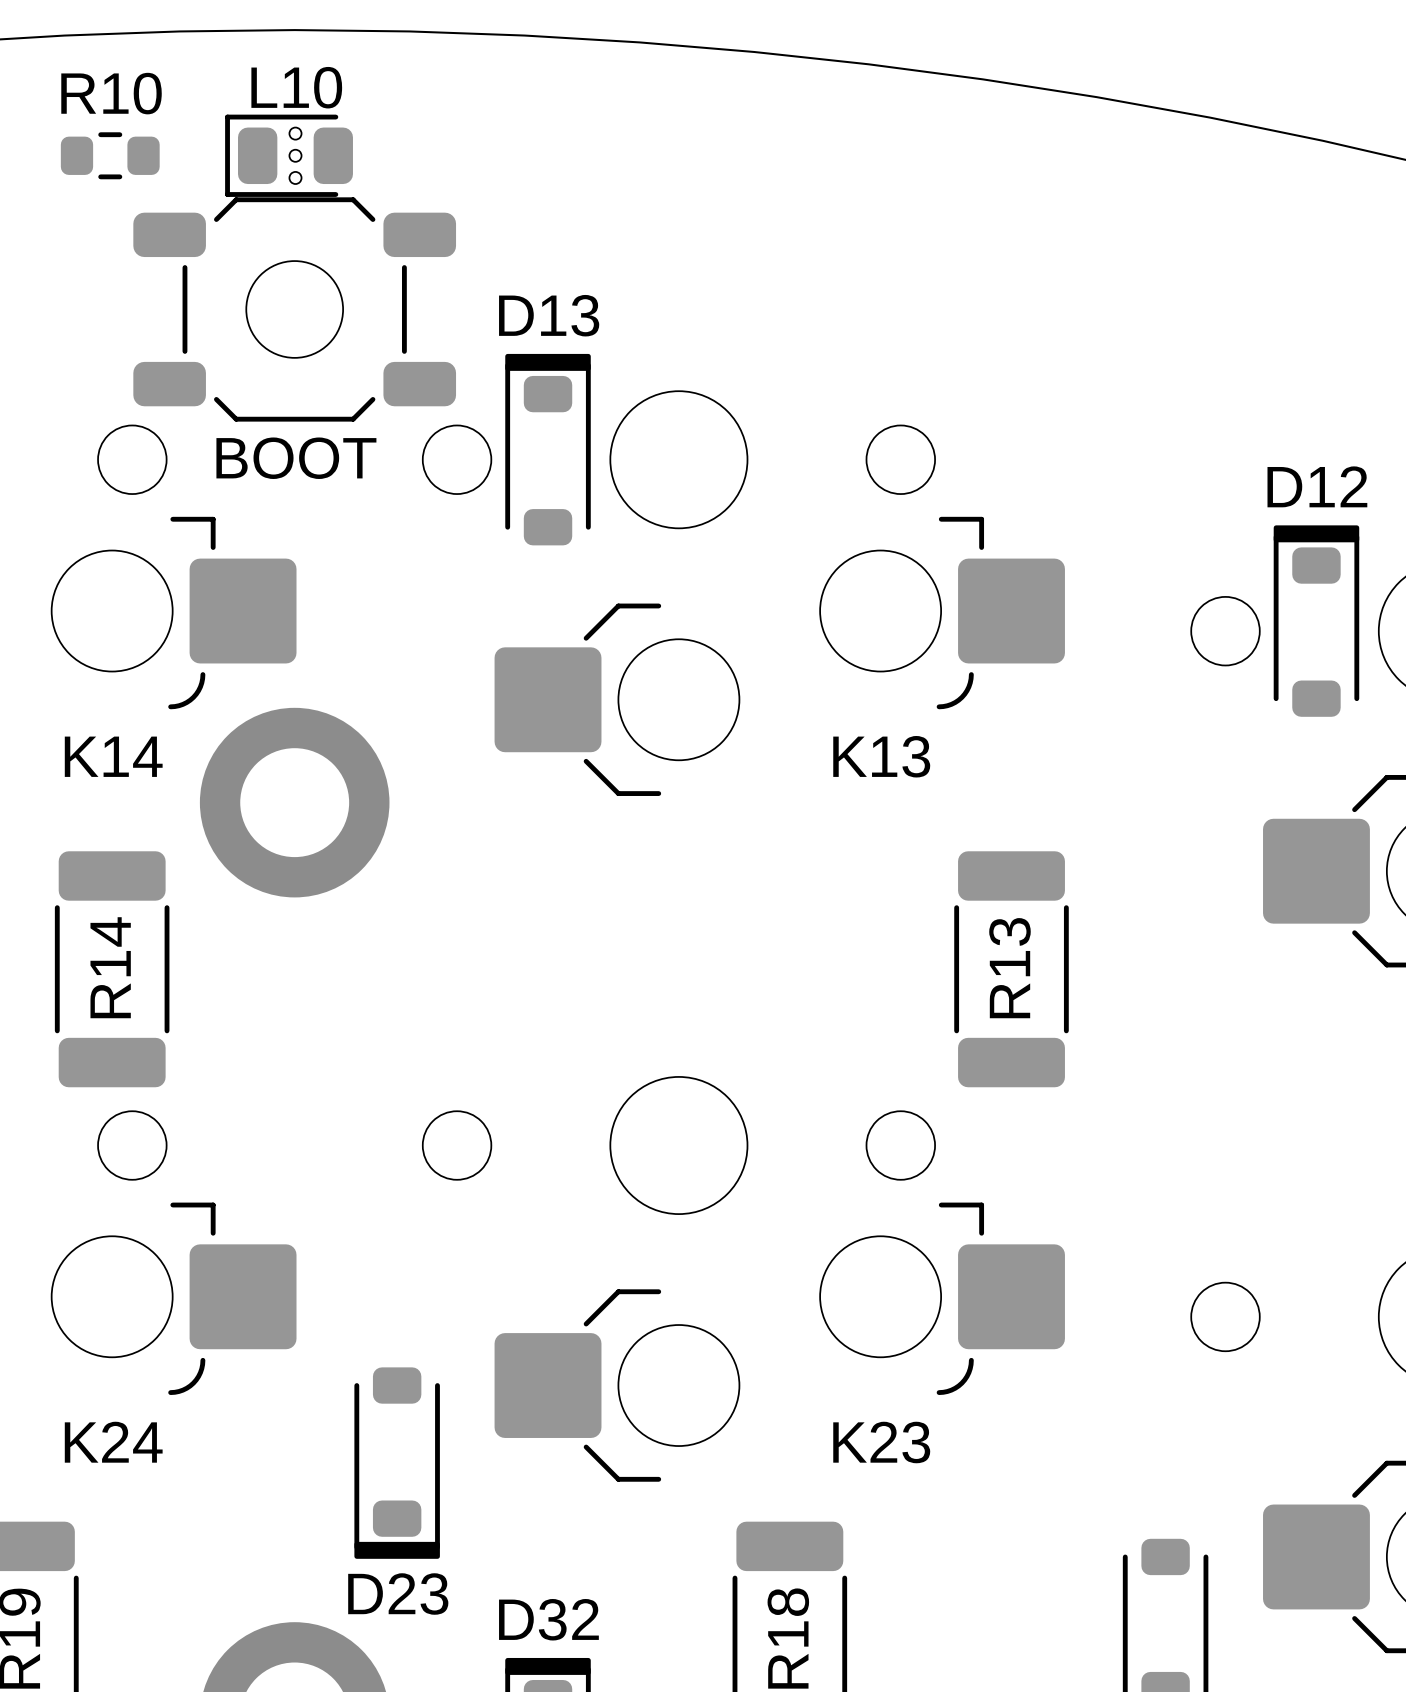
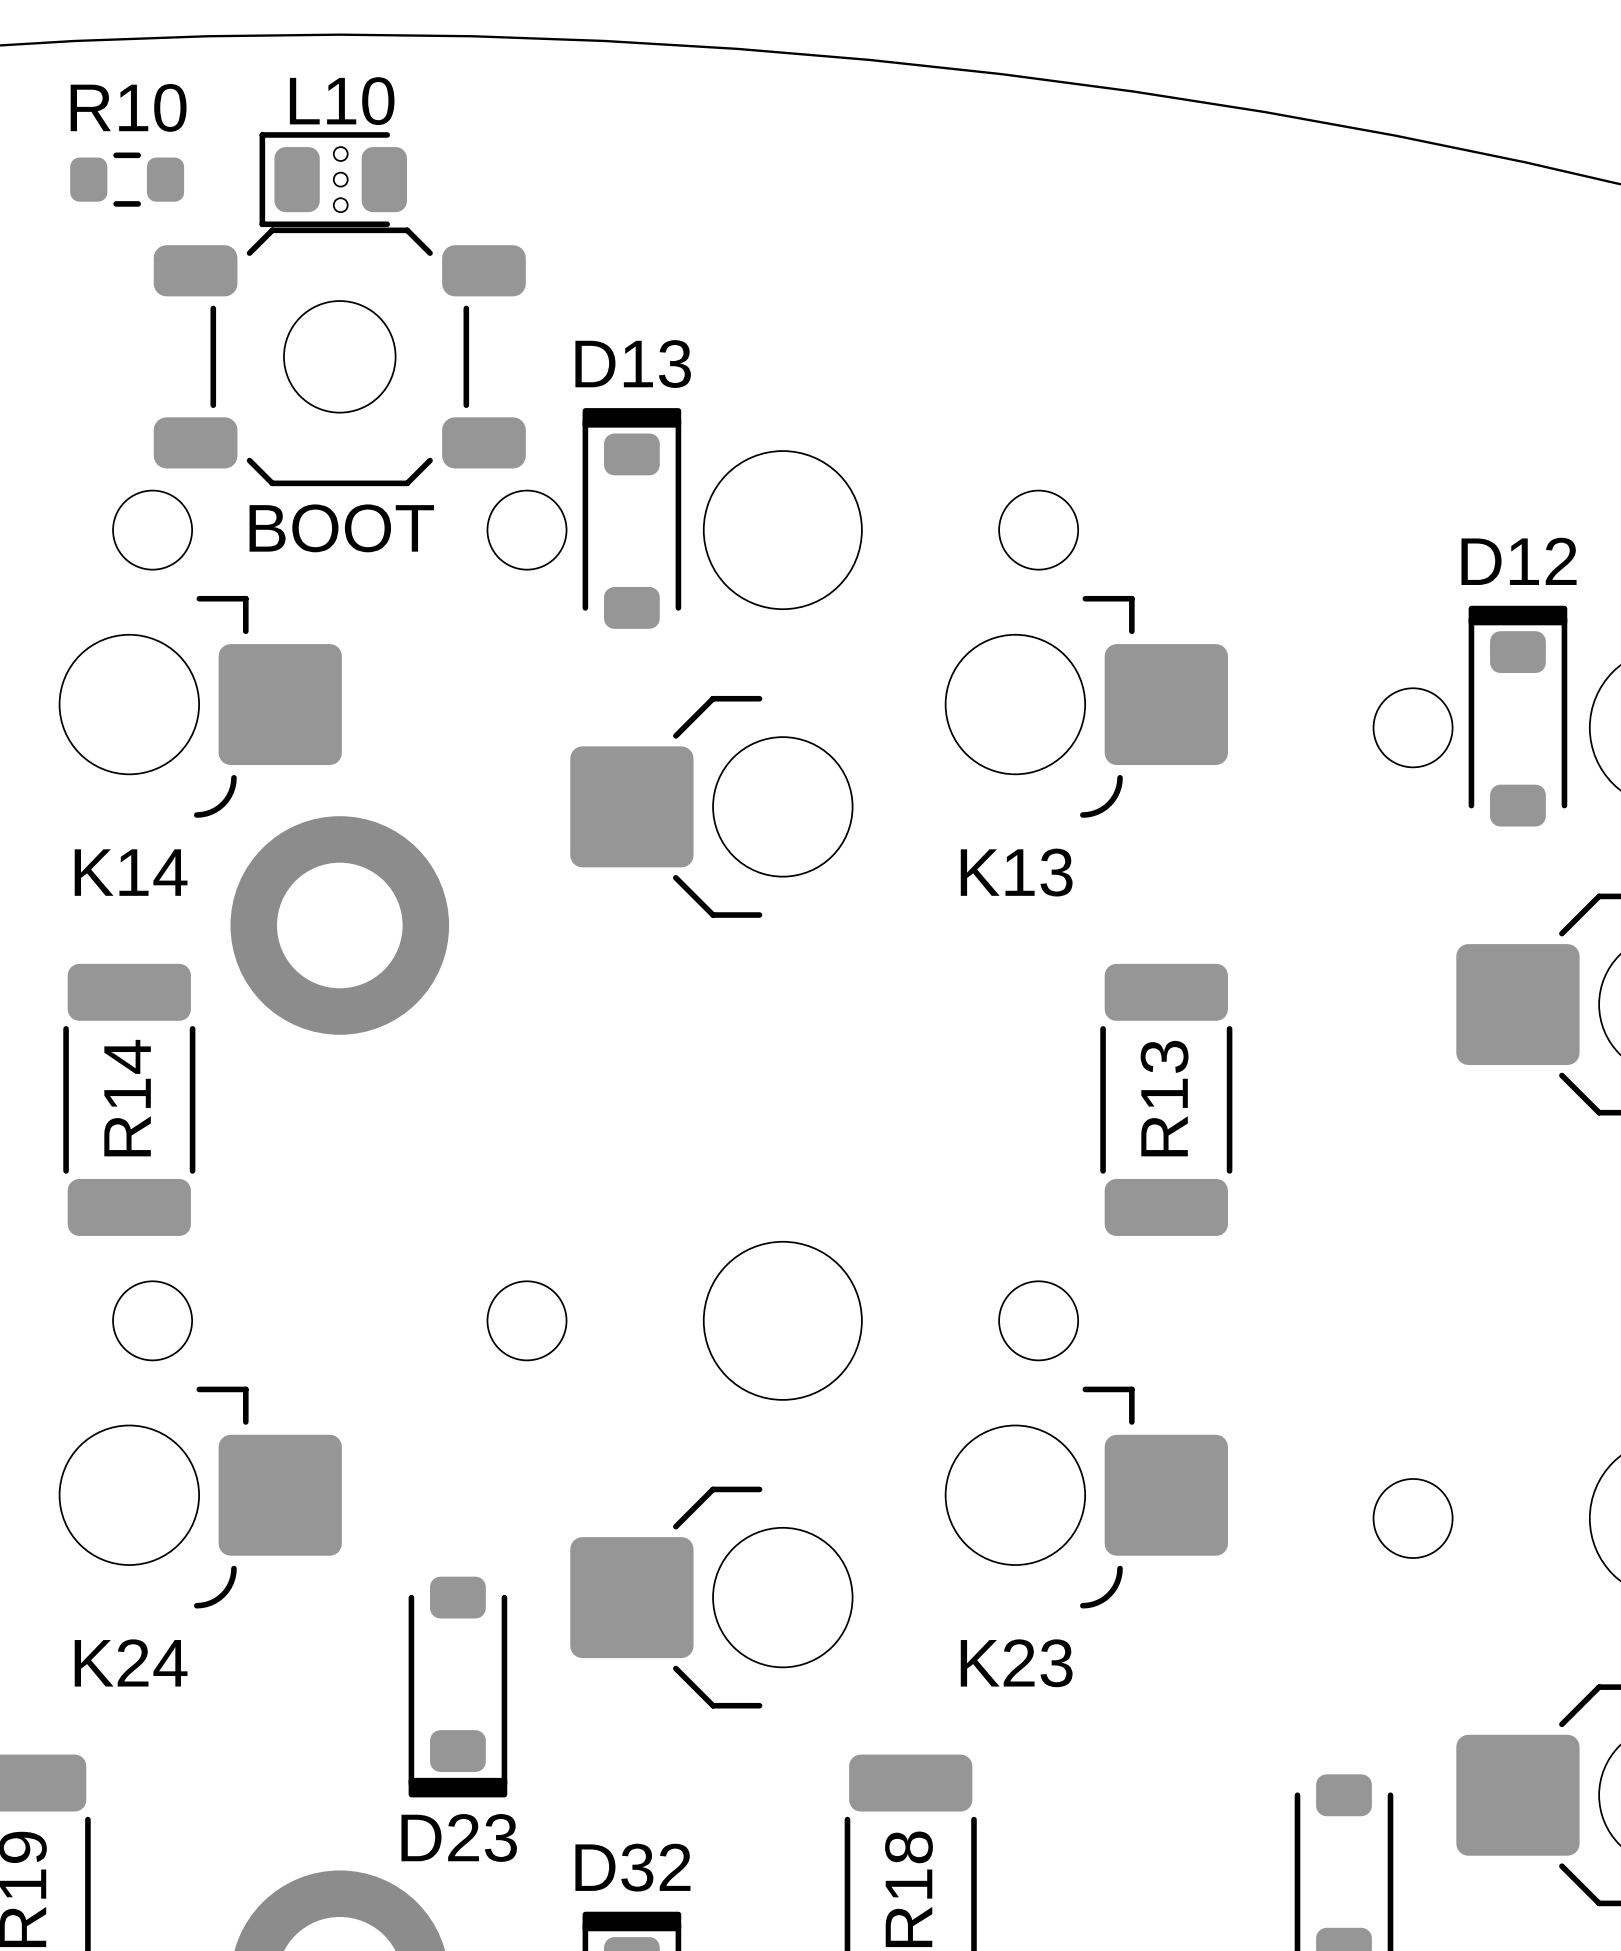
R14 position: (112, 969) -> (129, 1099)
R13 position: (1011, 969) -> (1166, 1099)

